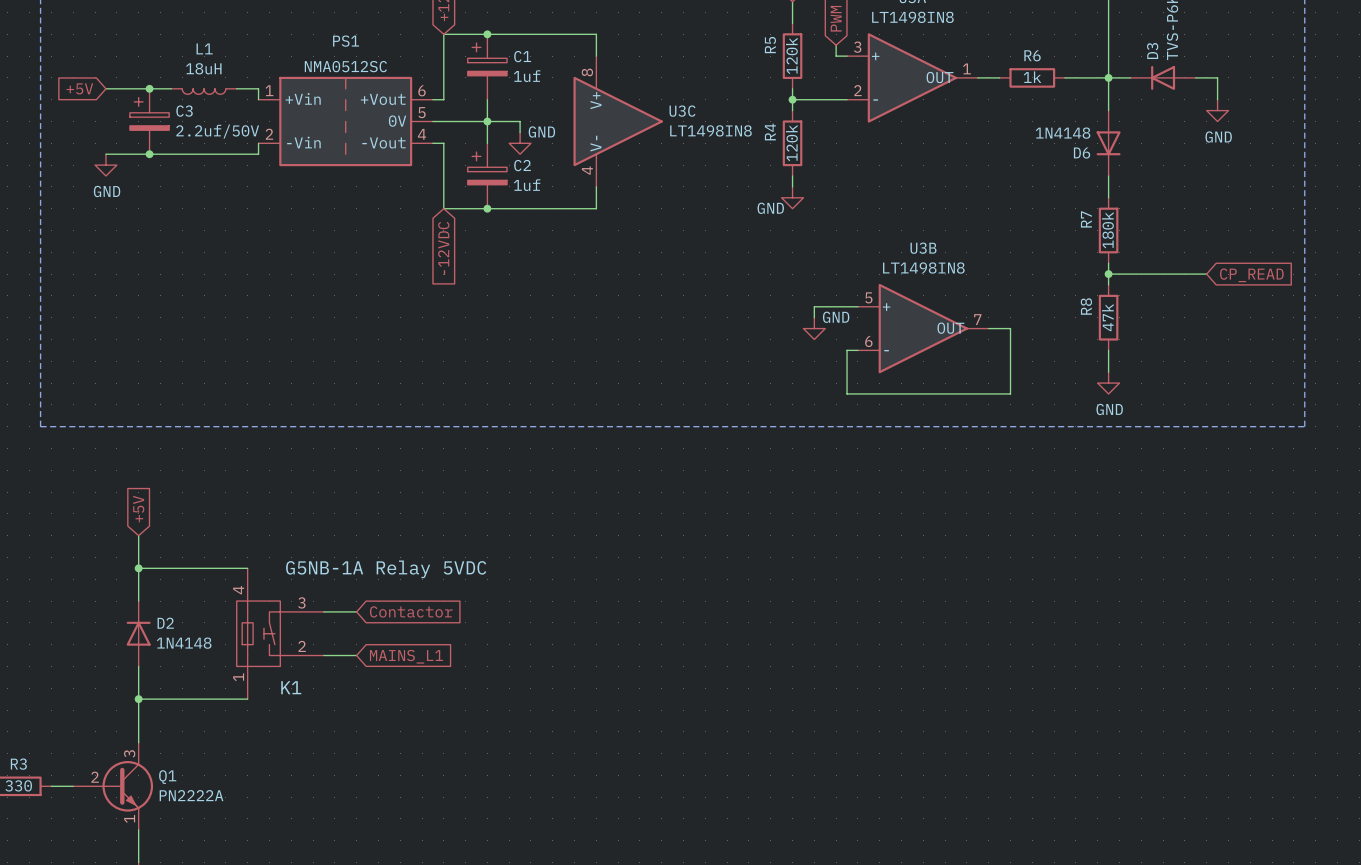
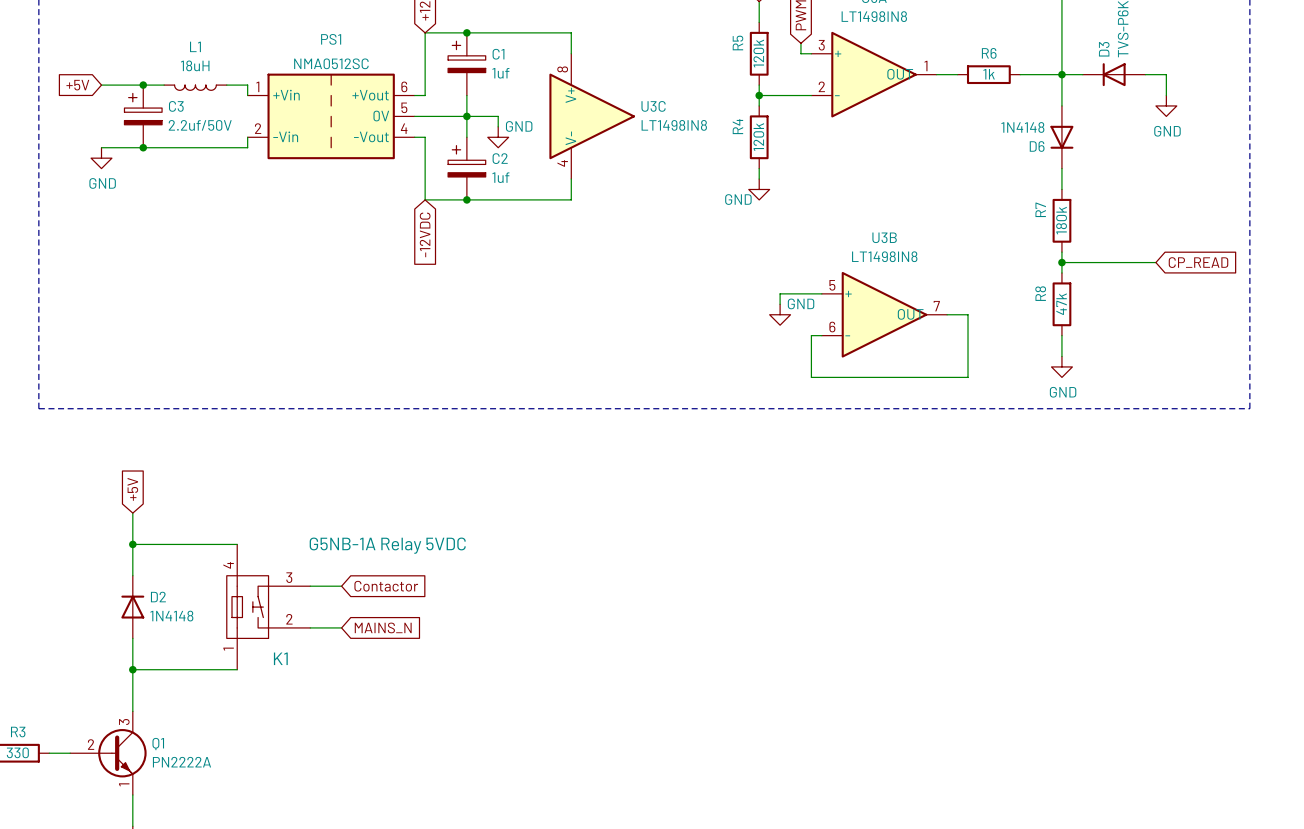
global label: MAINS_L1 (406, 656) -> MAINS_N (383, 627)

